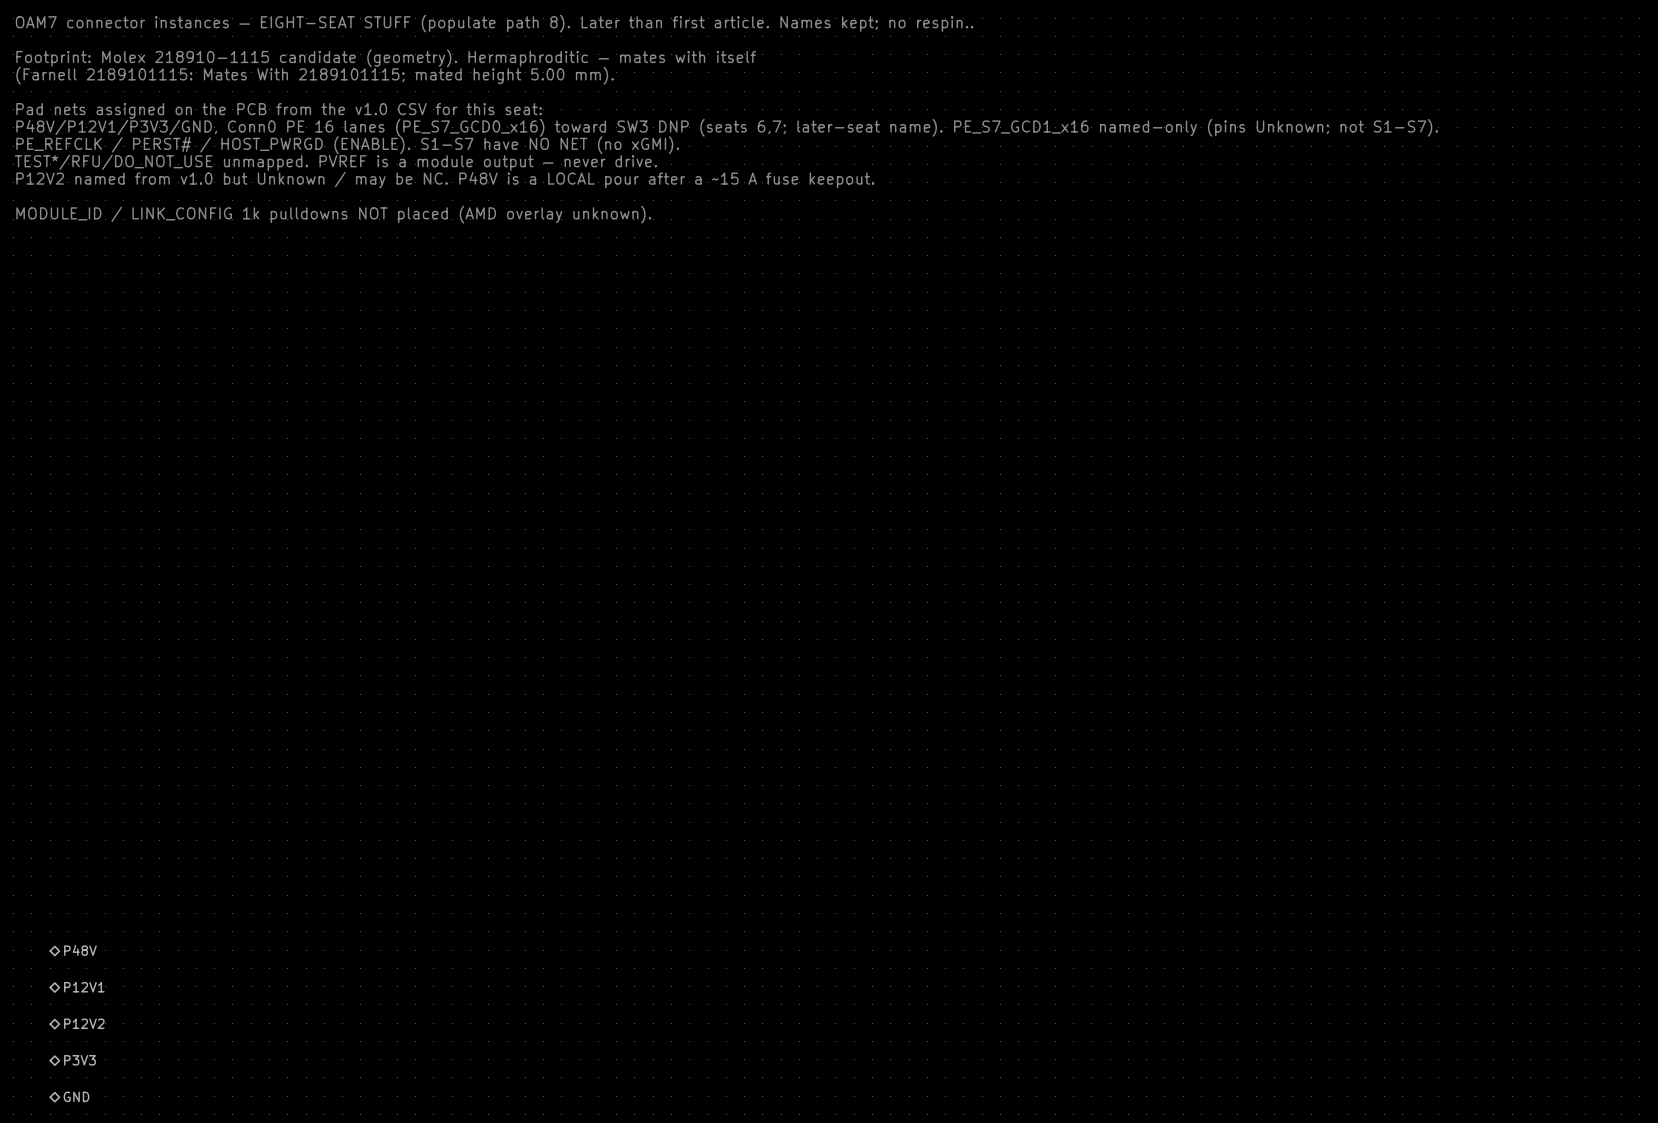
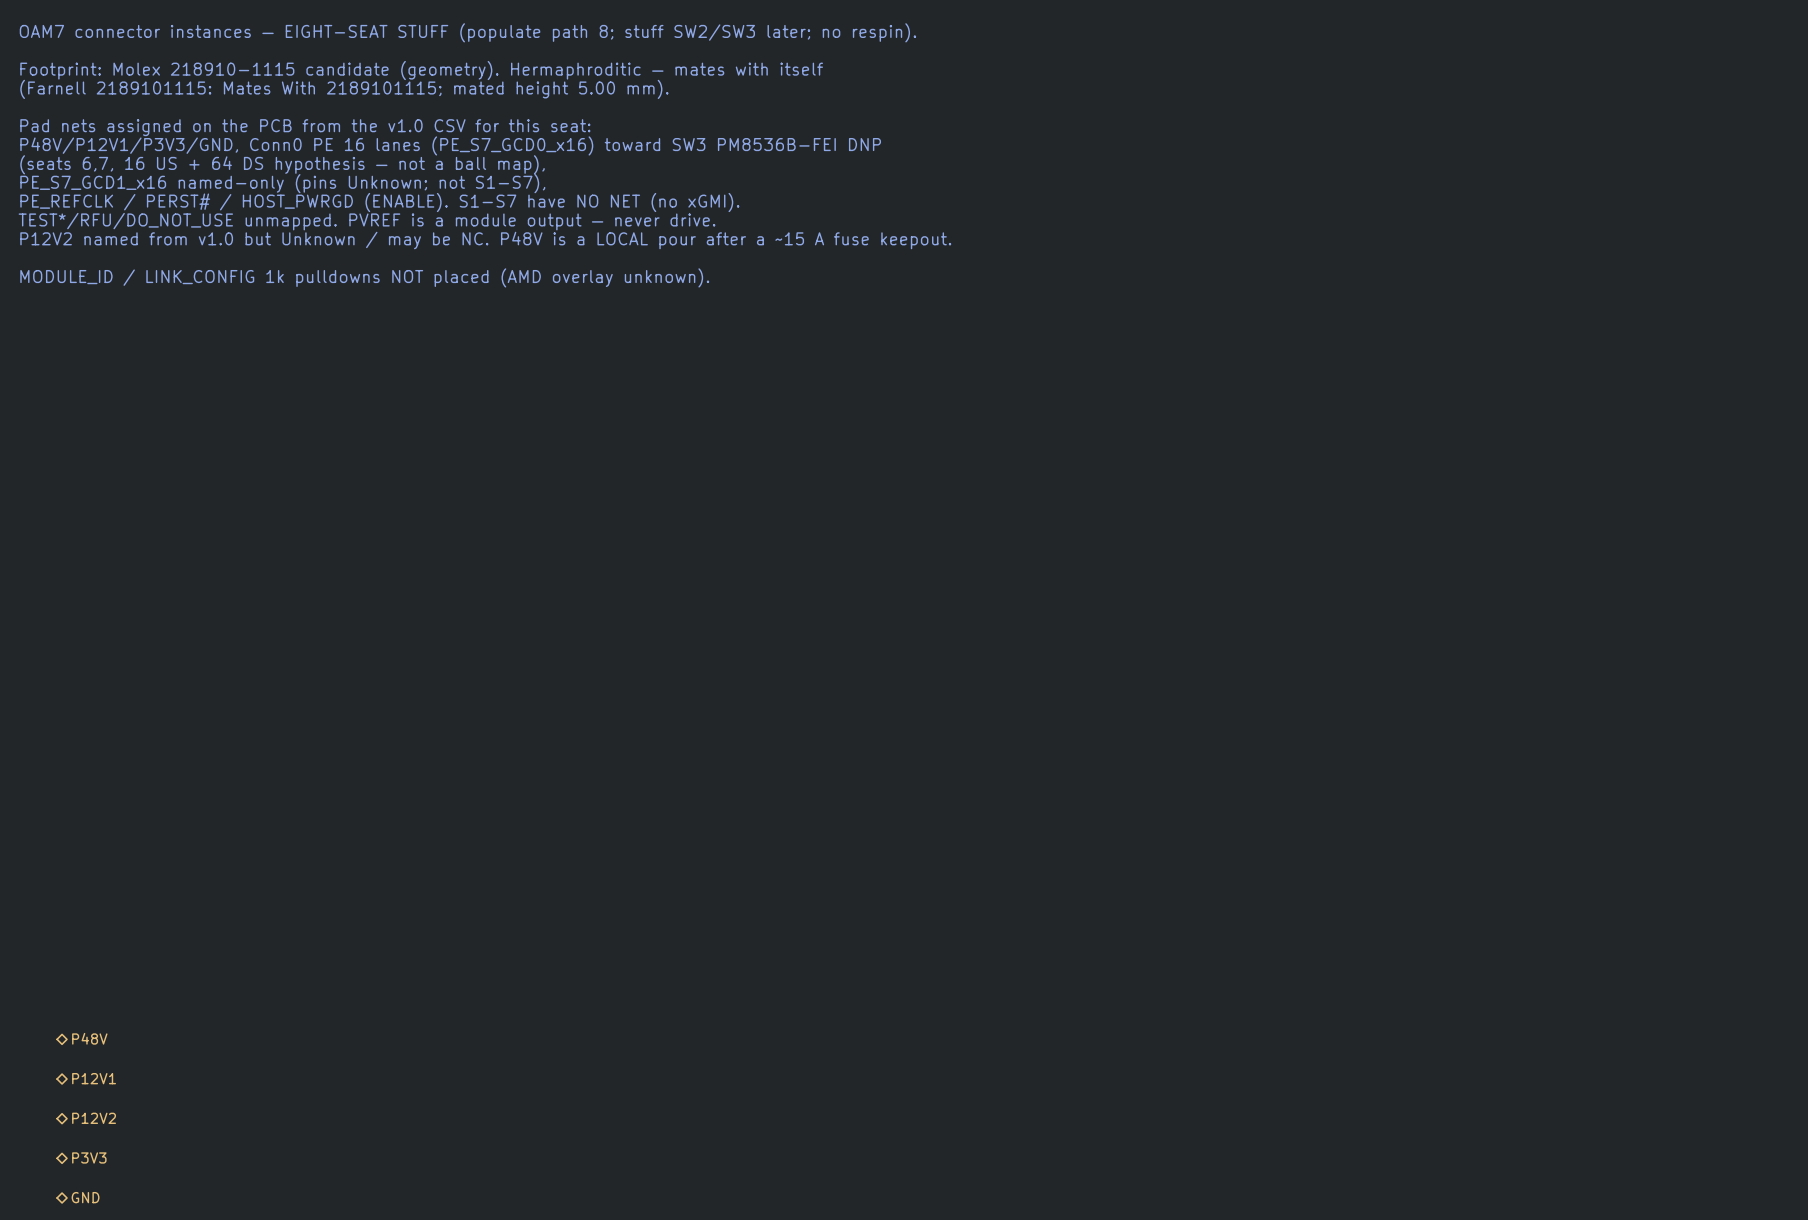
text: OAM7 connector instances — EIGHT-SEAT STUFF (populate path 8). Later than first article. Names kept; no respin.. (494, 23) -> OAM7 connector instances — EIGHT-SEAT STUFF (populate path 8; stuff SW2/SW3 later; no respin). (467, 32)
text: P48V/P12V1/P3V3/GND, Conn0 PE 16 lanes (PE_S7_GCD0_x16) toward SW3 DNP (seats 6,7; later-seat name). PE_S7_GCD1_x16 named-only (pins Unknown; not S1-S7). (727, 127) -> P48V/P12V1/P3V3/GND, Conn0 PE 16 lanes (PE_S7_GCD0_x16) toward SW3 PM8536B-FEI DNP (450, 145)
text: PE_REFCLK / PERST# / HOST_PWRGD (ENABLE). S1-S7 have NO NET (no xGMI). (347, 145) -> (seats 6,7, 16 US + 64 DS hypothesis — not a ball map), (282, 164)
text: TEST*/RFU/DO_NOT_USE unmapped. PVREF is a module output — never drive. (335, 162) -> PE_S7_GCD1_x16 named-only (pins Unknown; not S1-S7), (282, 183)
text: P12V2 named from v1.0 but Unknown / may be NC. P48V is a LOCAL pour after a ~15 A fuse keepout. (445, 180) -> PE_REFCLK / PERST# / HOST_PWRGD (ENABLE). S1-S7 have NO NET (no xGMI). (379, 202)
text: none -> TEST*/RFU/DO_NOT_USE unmapped. PVREF is a module output — never drive. (367, 221)
text: MODULE_ID / LINK_CONFIG 1k pulldowns NOT placed (AMD overlay unknown). (333, 214) -> P12V2 named from v1.0 but Unknown / may be NC. P48V is a LOCAL pour after a ~15 A fuse keepout. (485, 240)
text: none -> MODULE_ID / LINK_CONFIG 1k pulldowns NOT placed (AMD overlay unknown). (364, 277)

